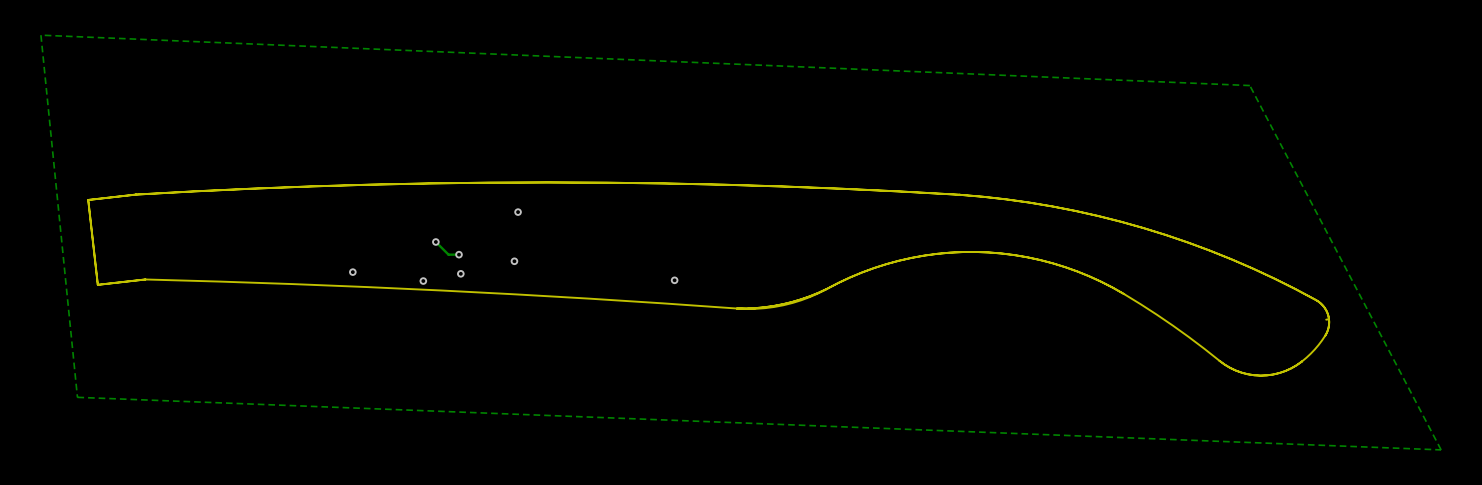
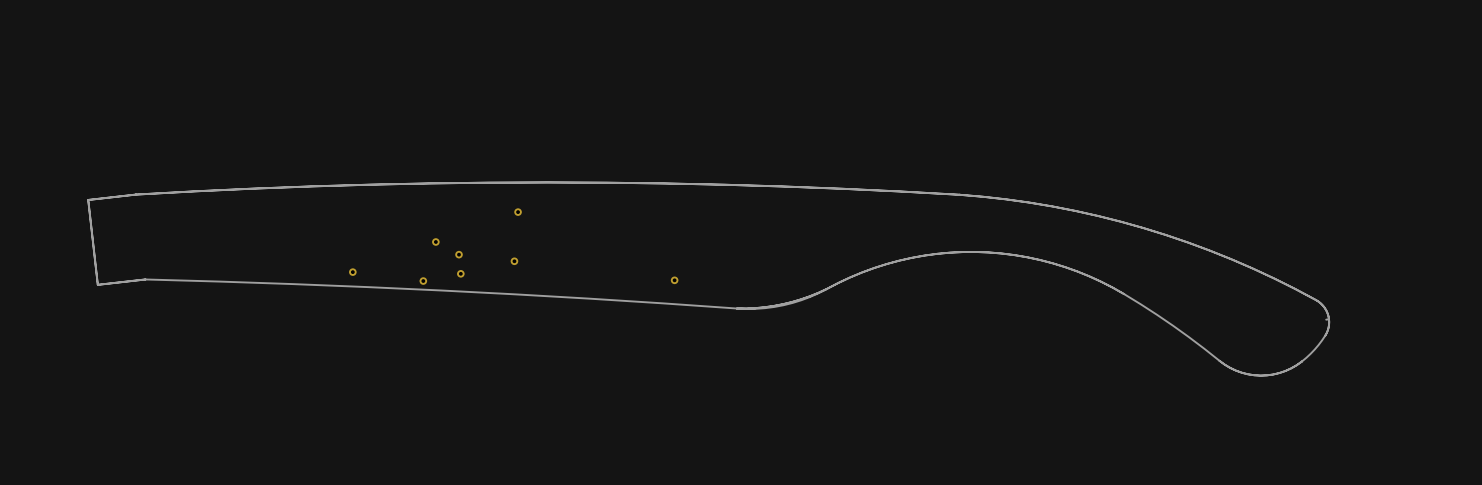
zone outline: (40, 35) (1249, 85) (1441, 449) (77, 397) (40, 35) -> none
track: (435, 241) (448, 254) (459, 254) -> none

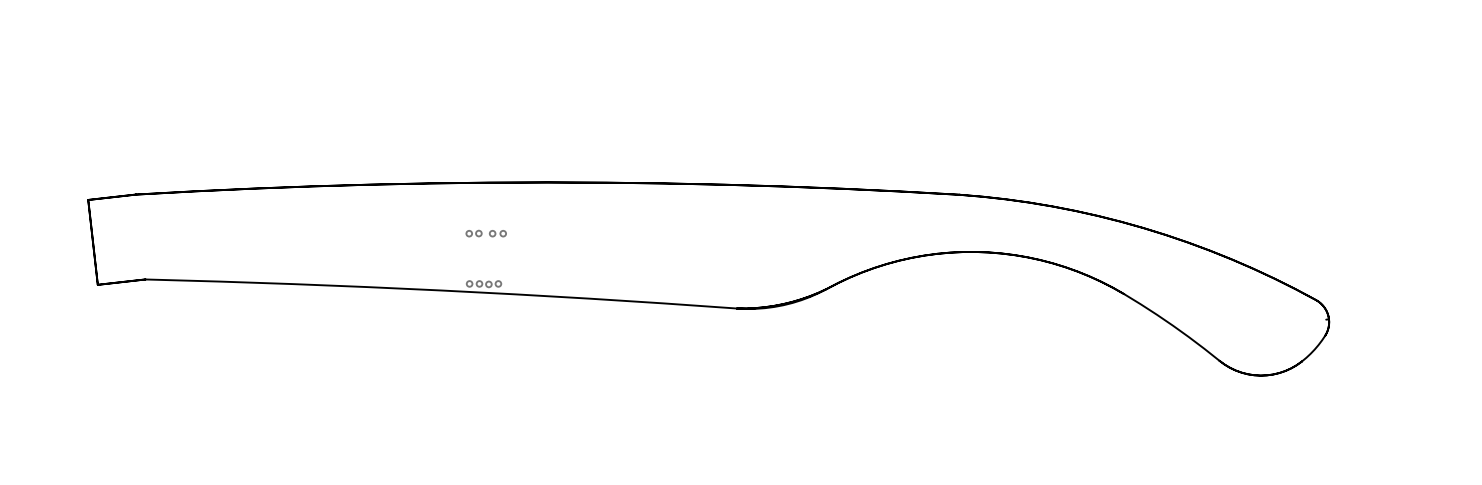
via: (518, 212) -> none
via: none -> (469, 233)
via: none -> (478, 233)
via: none -> (492, 233)
via: none -> (503, 233)
via: (435, 241) -> none
via: (459, 254) -> none
via: (514, 261) -> none
via: (352, 272) -> none
via: (460, 273) -> none
via: (674, 280) -> none
via: (423, 281) -> none
via: none -> (469, 283)
via: none -> (479, 283)
via: none -> (498, 283)
via: none -> (488, 284)

